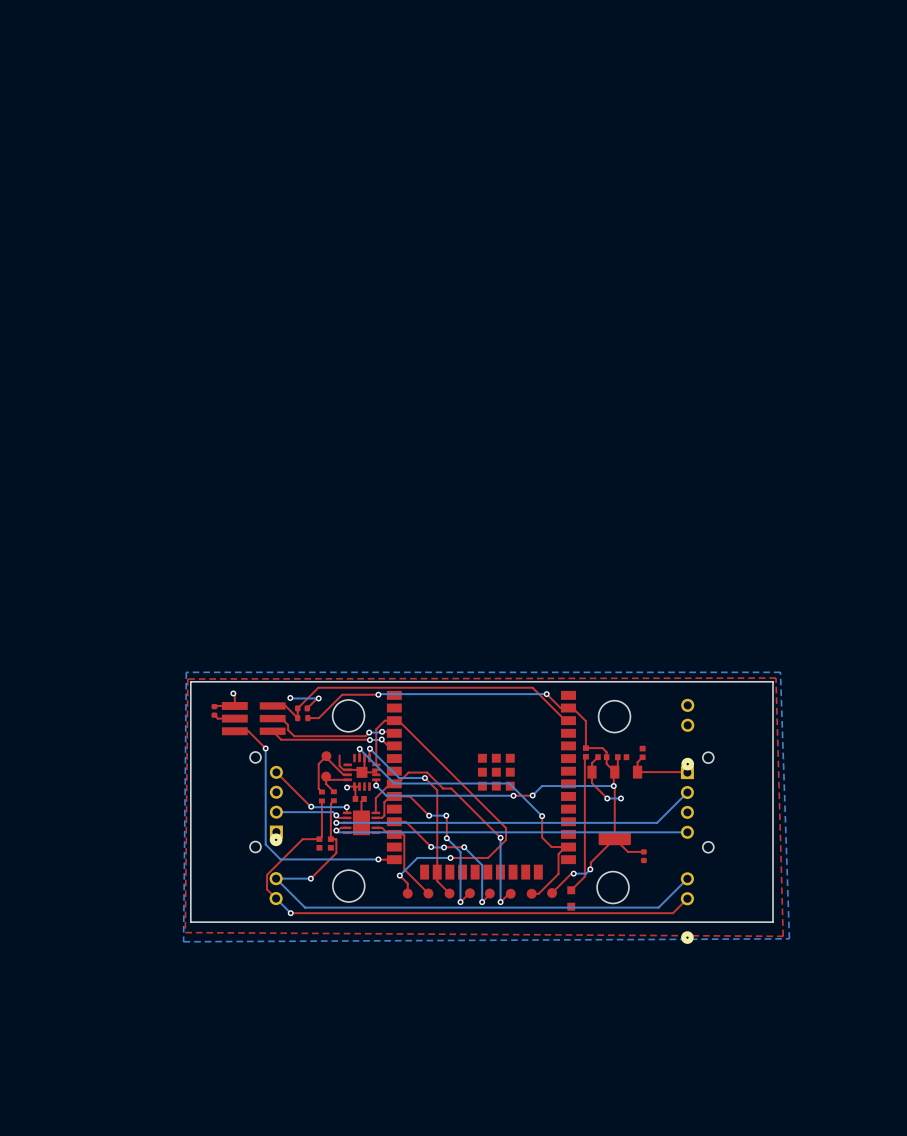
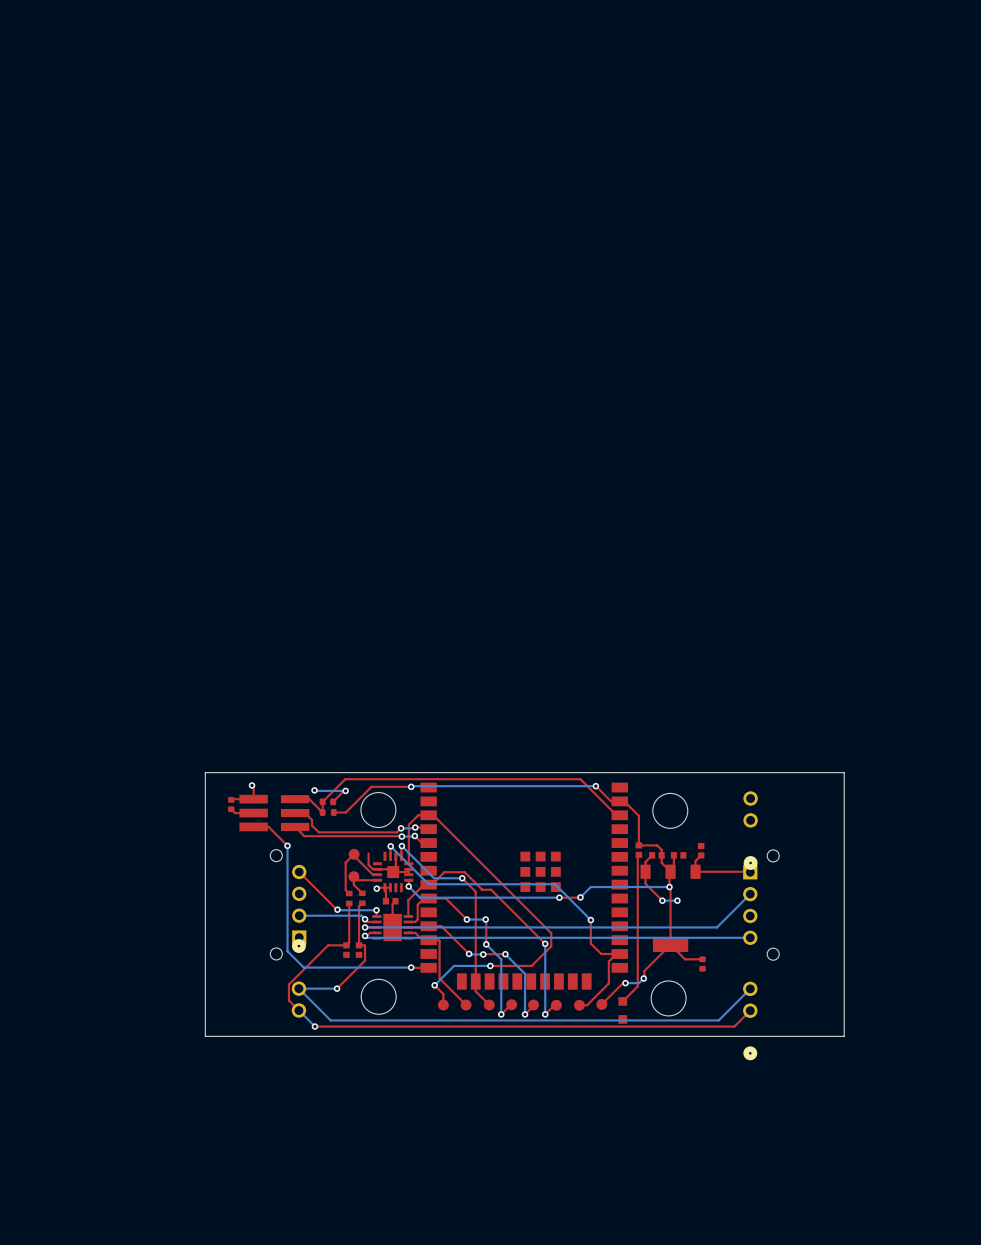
bottom zone outline: (780, 672) (186, 672) (183, 941) (789, 938) (780, 672) -> none
top zone outline: (775, 678) (187, 679) (185, 932) (783, 936) (775, 678) -> none

